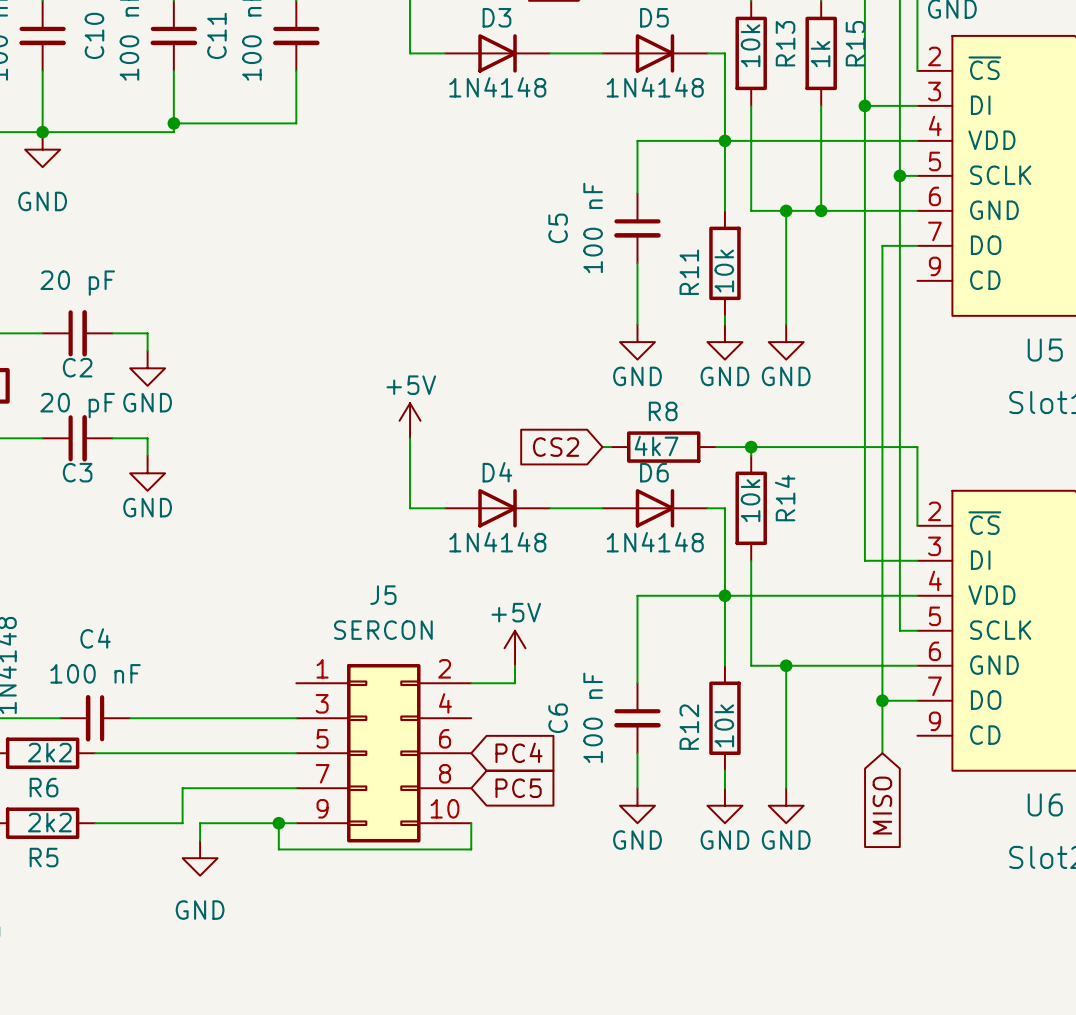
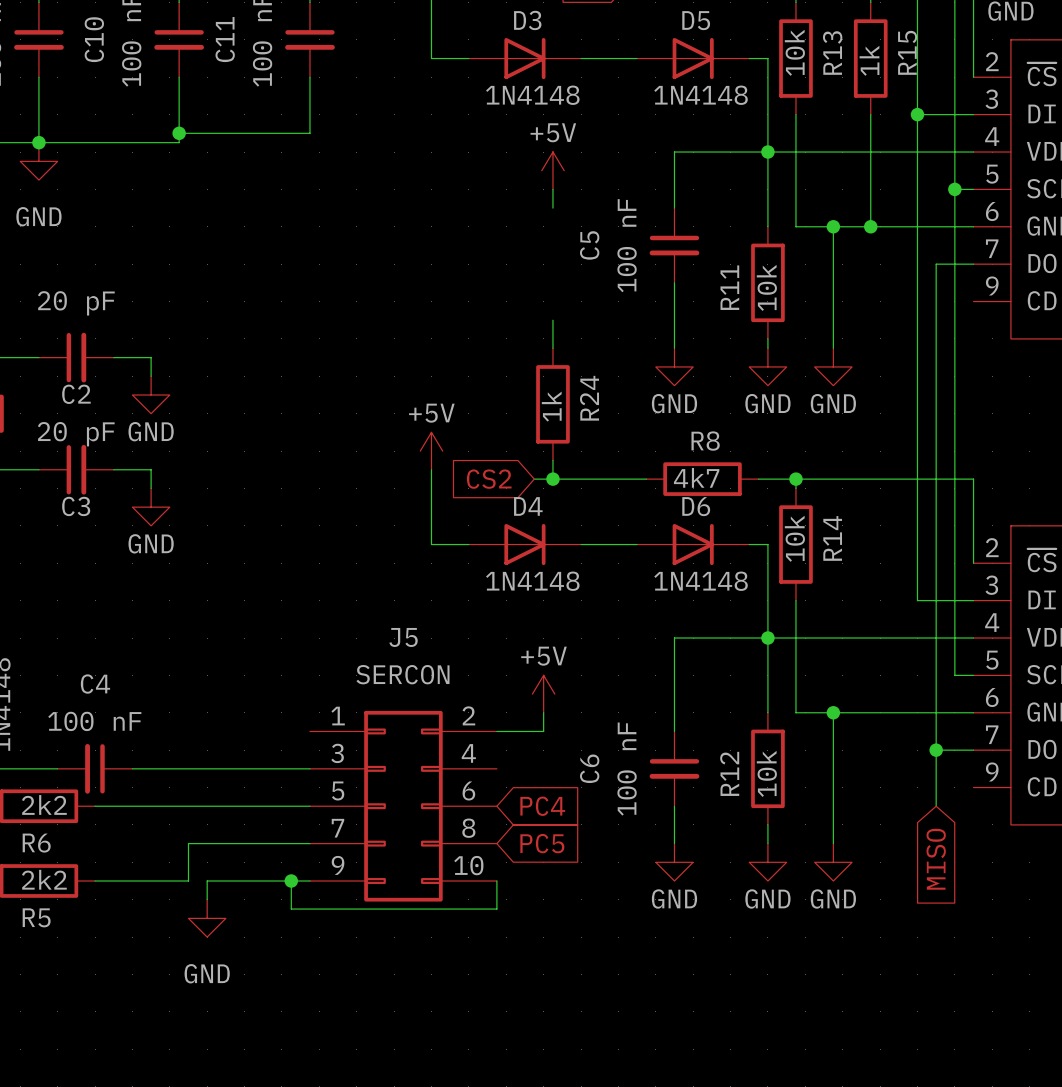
power symbol: none -> +5V (552, 170)
wire: none -> (552, 189) (552, 208)
wire: none -> (552, 320) (552, 348)
R24: none -> 1k (552, 404)
wire: none -> (552, 460) (552, 479)
wire: none -> (534, 479) (637, 479)
junction: none -> (552, 479)
global label position: CS2 (556, 447) -> CS2 (489, 479)

